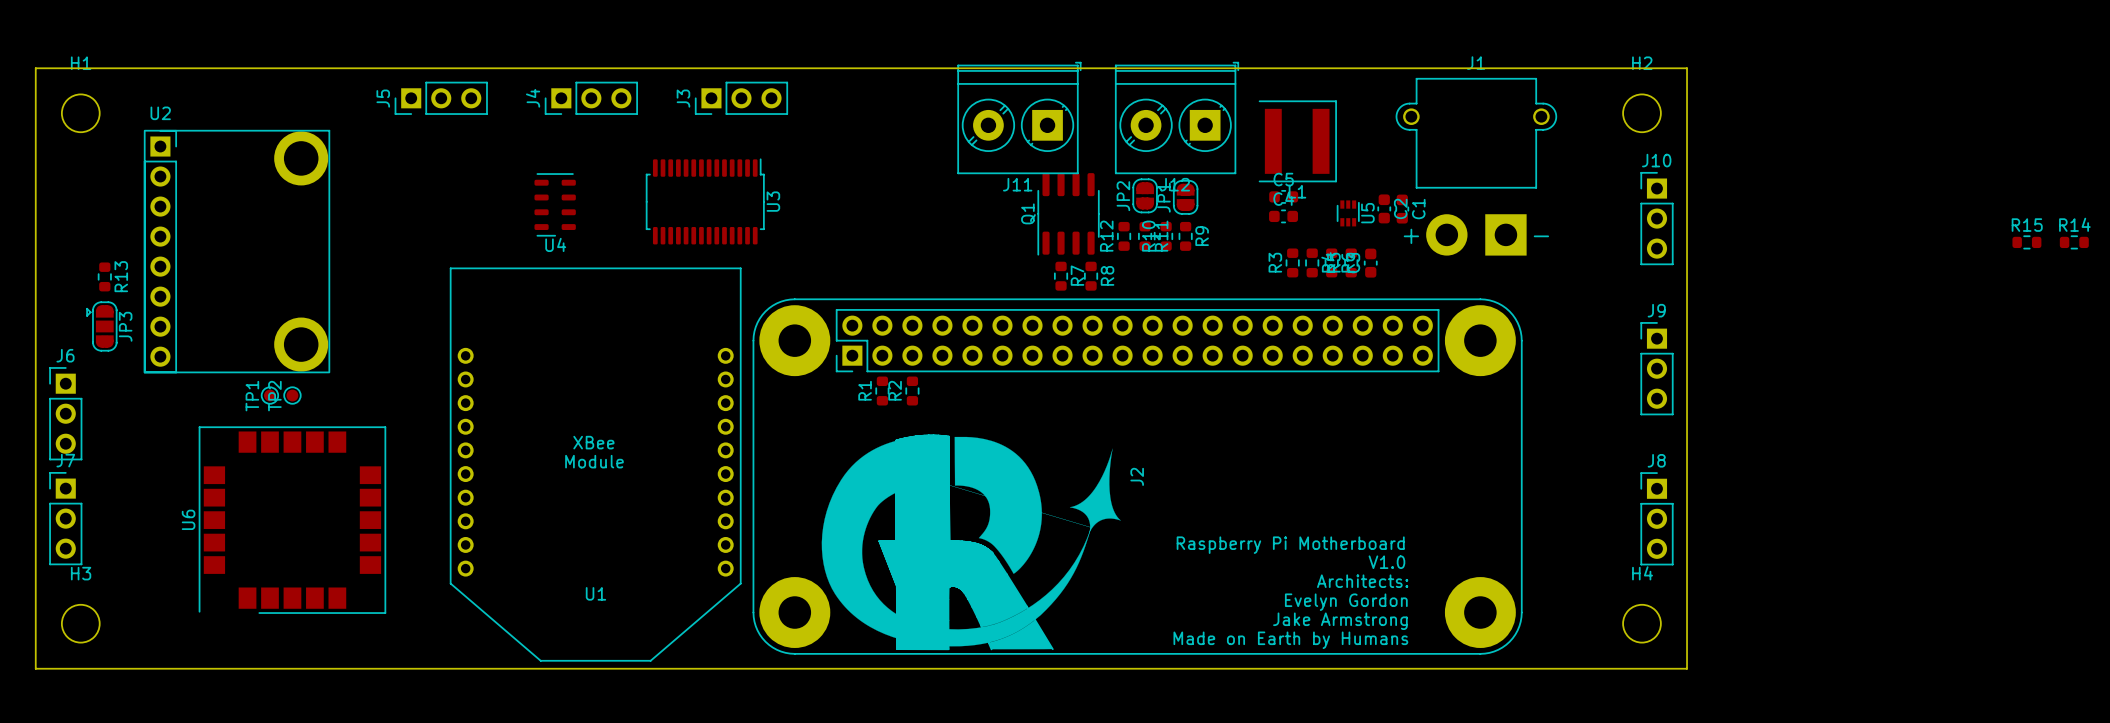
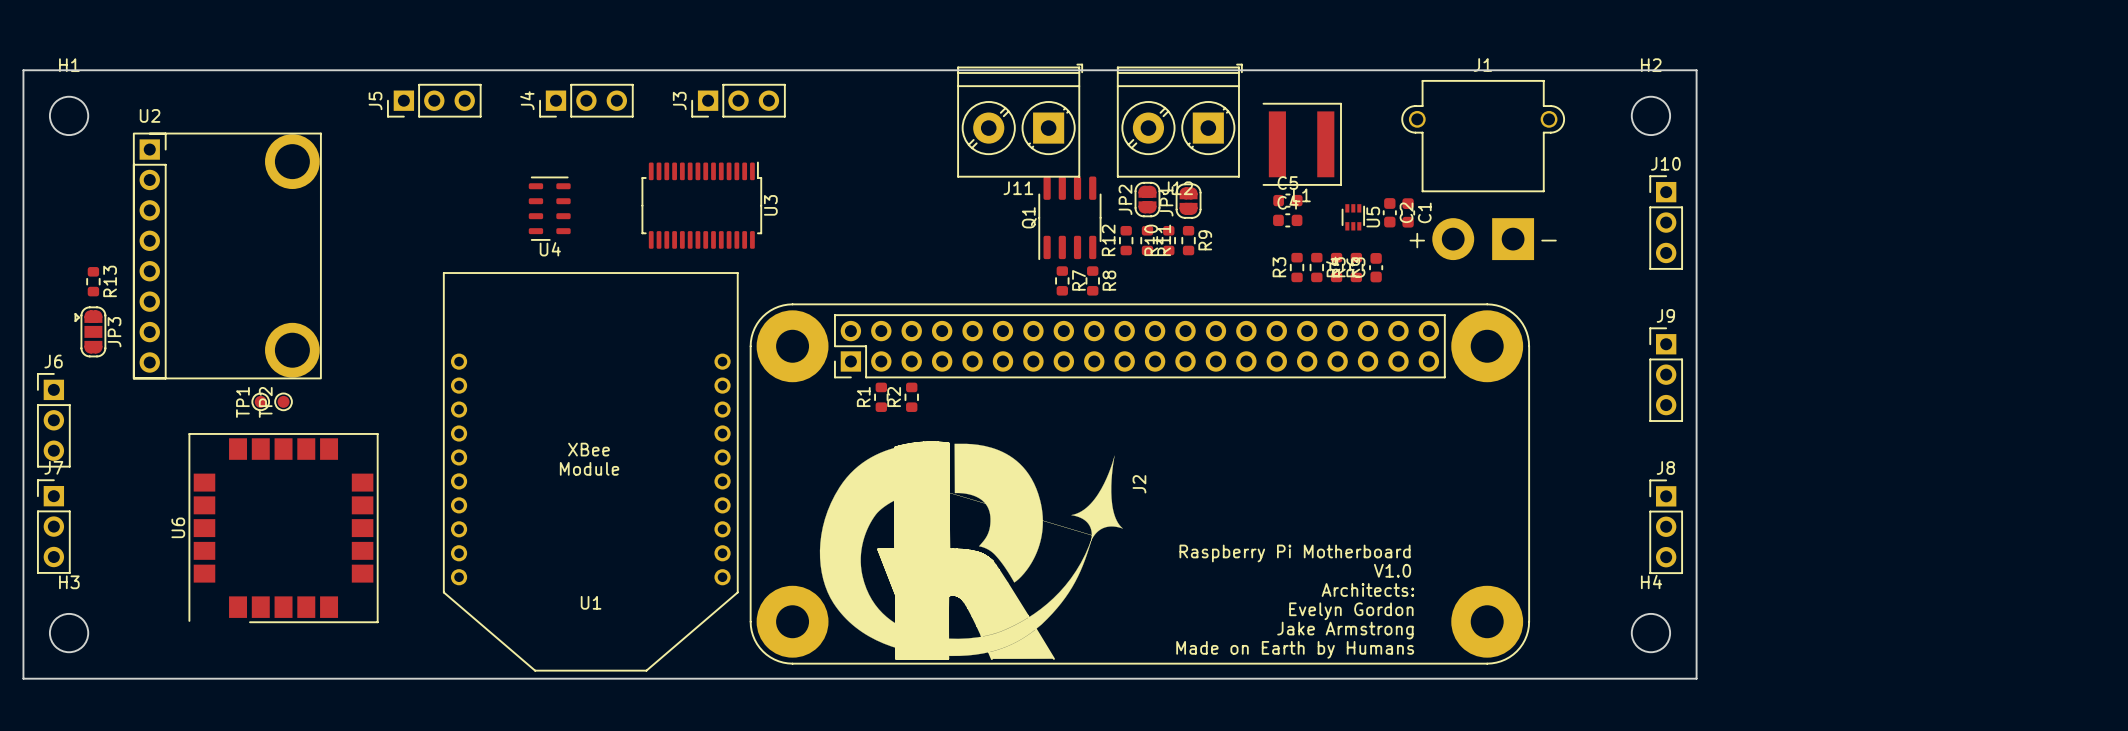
R15: (2026, 242) -> none
R14: (2074, 242) -> none

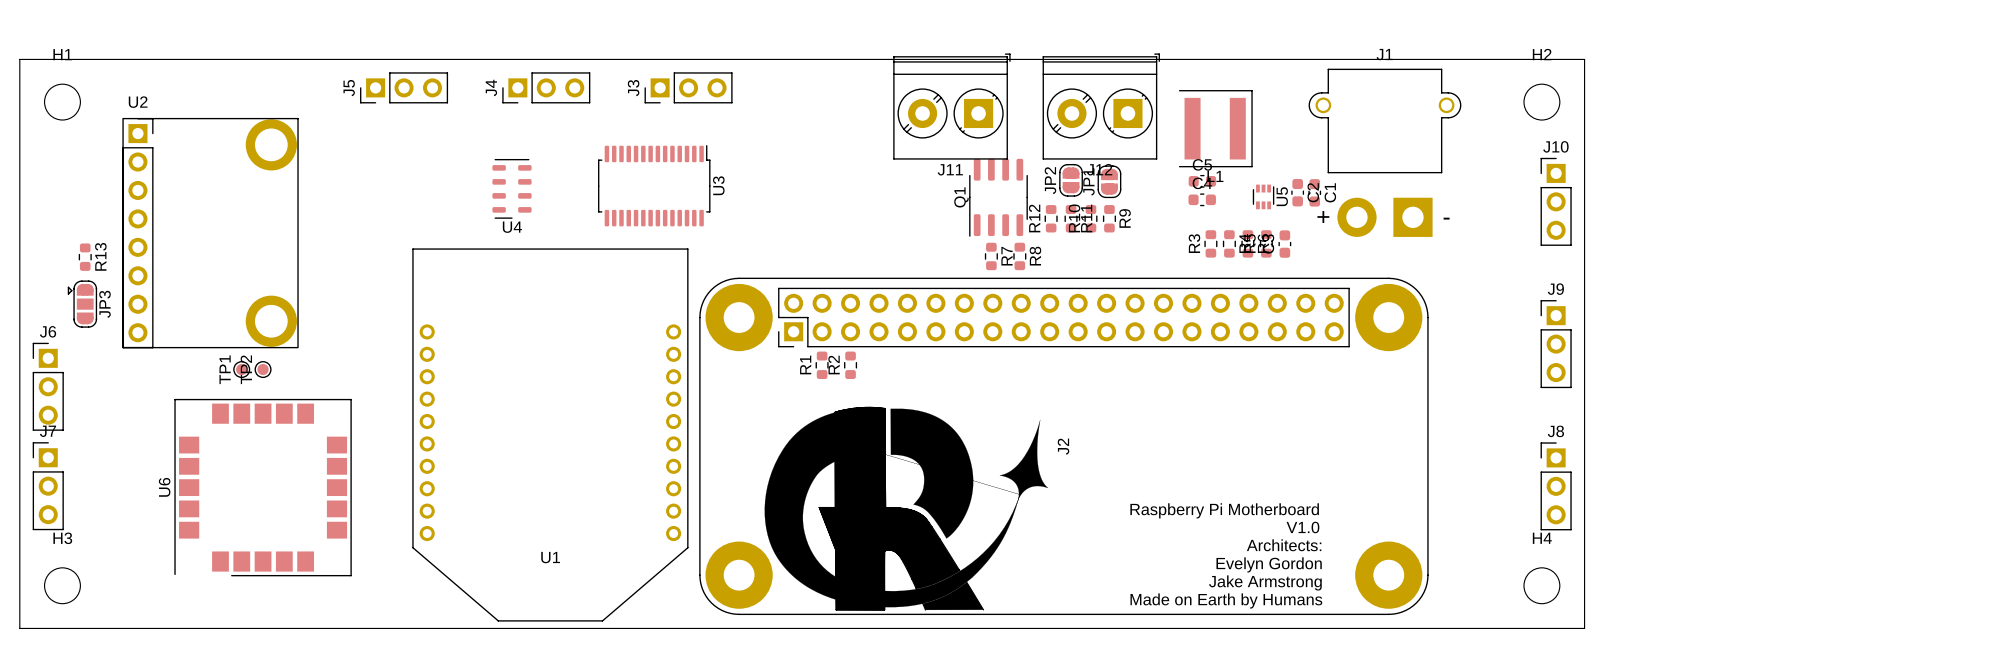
text: XBee (588, 449) -> none
text: Module (589, 468) -> none

